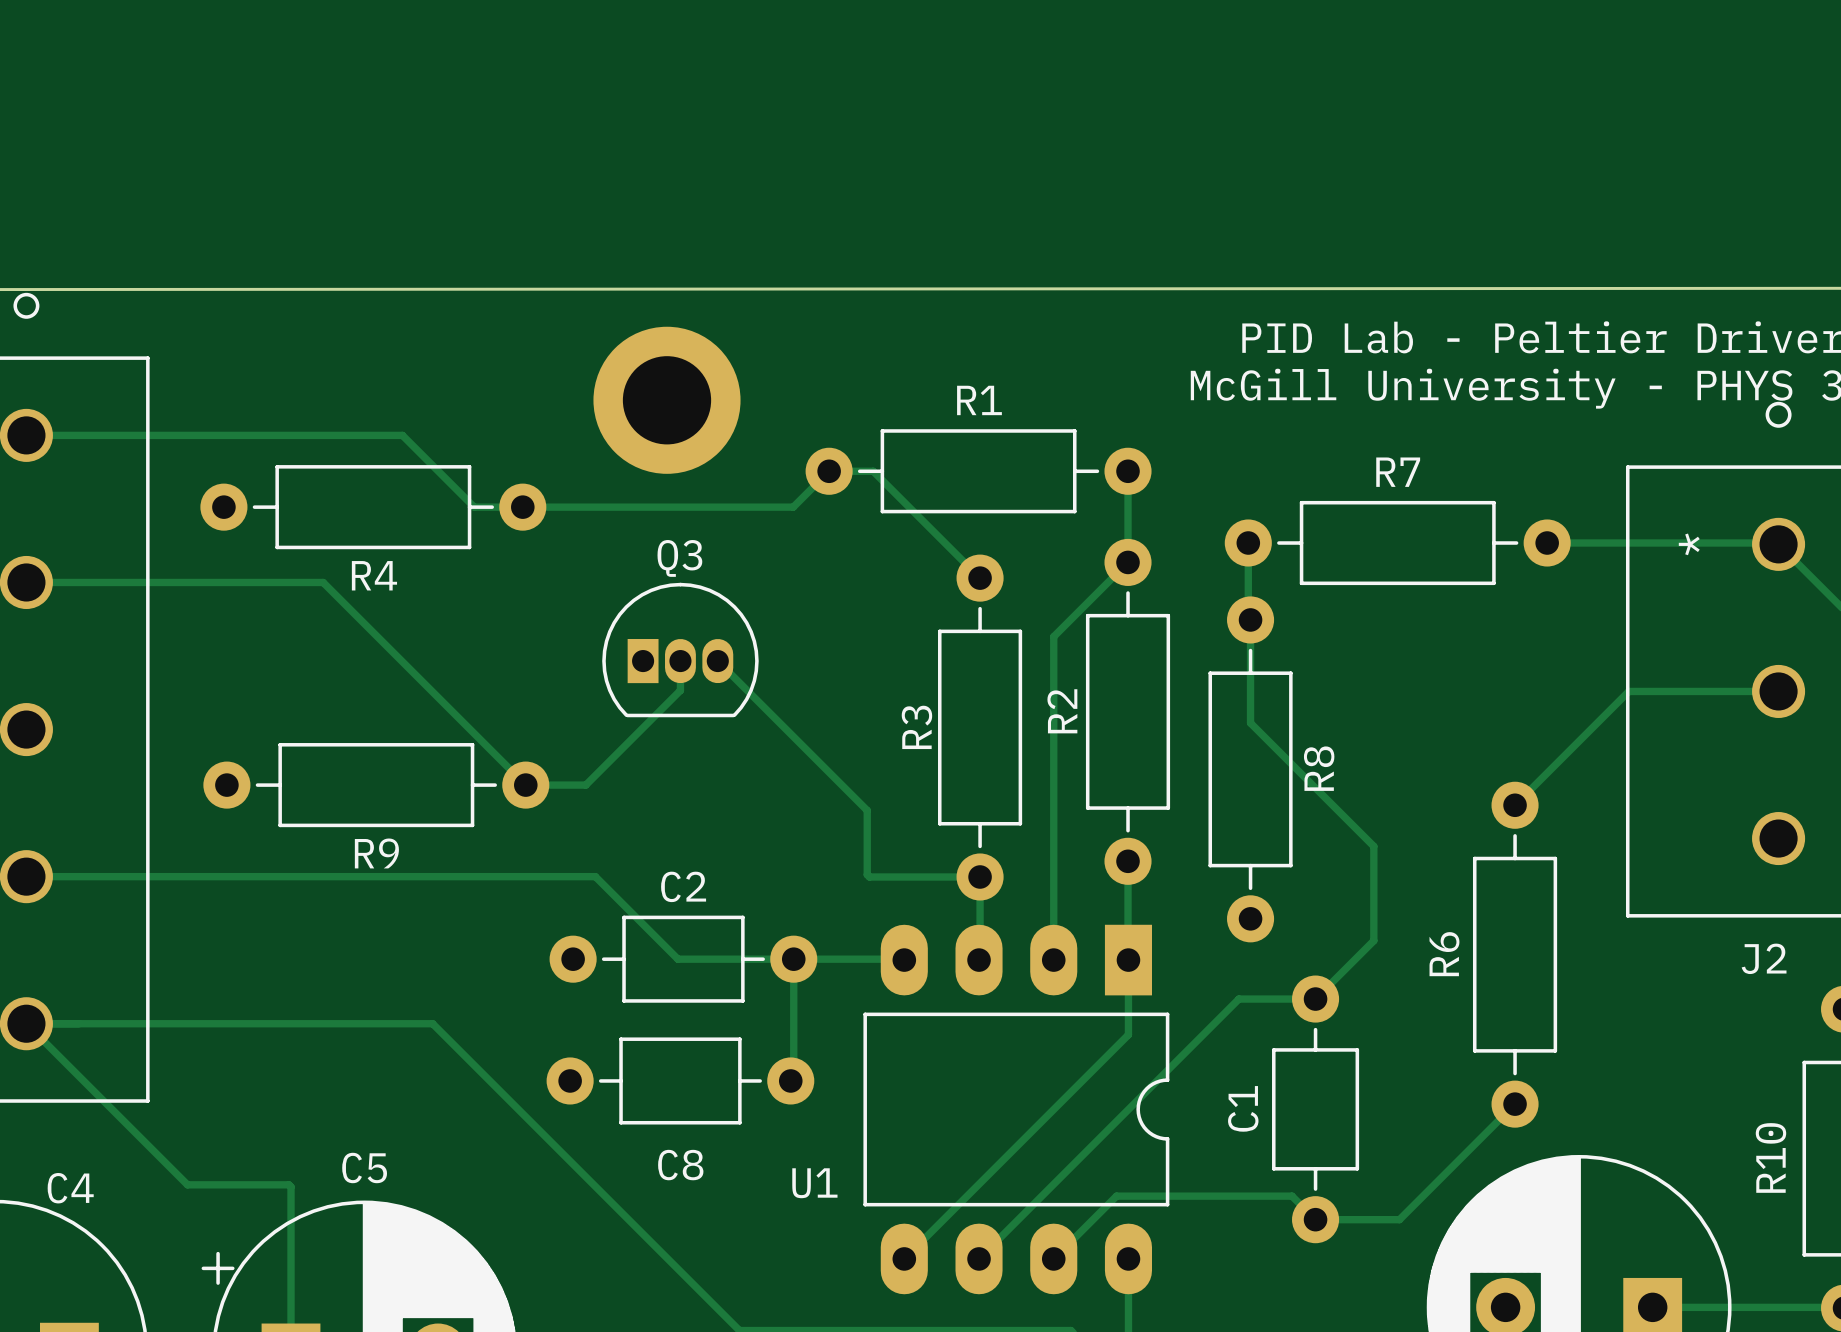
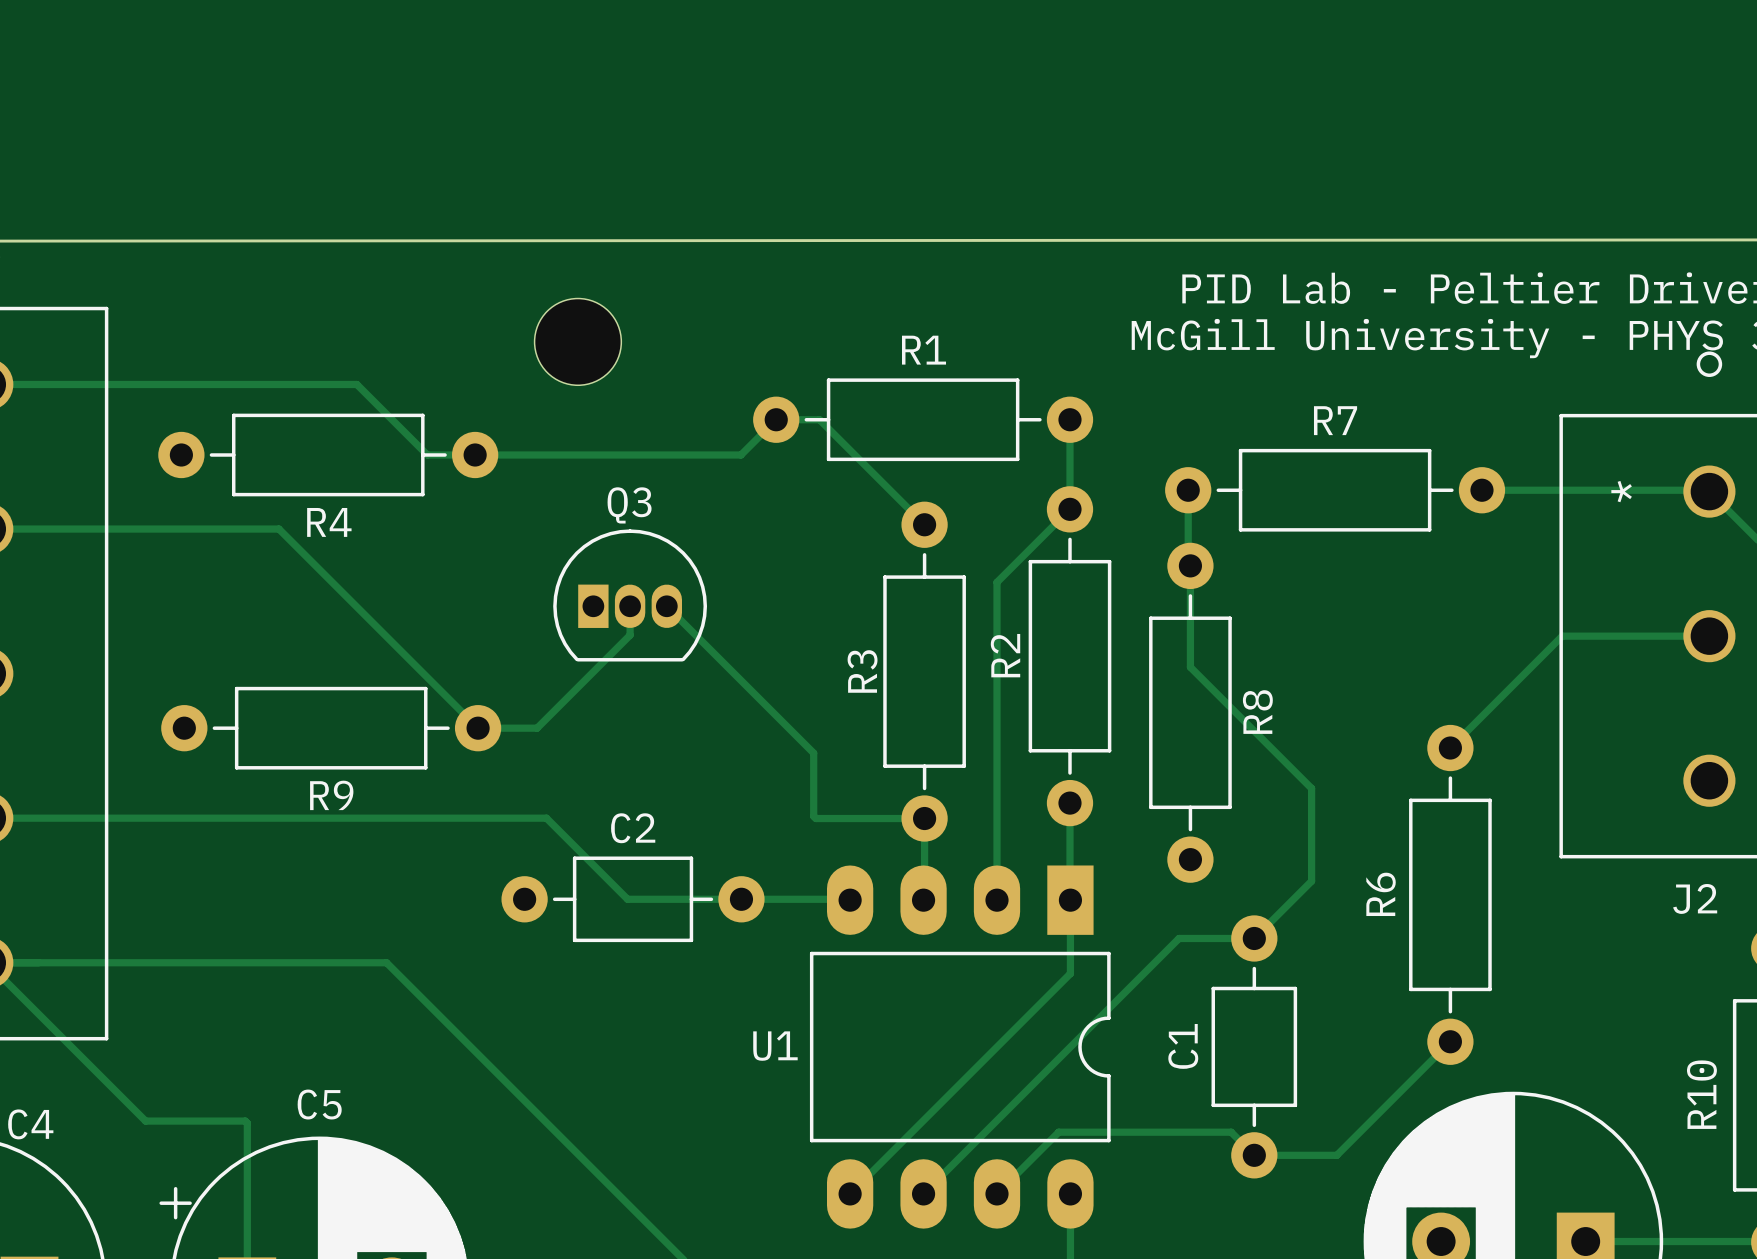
part: none -> (577, 341)
part: (667, 400) -> none
track: (793, 959) (793, 1077) (790, 1080) -> none
C8: (680, 1080) -> none
U1 name position: U1 (814, 1183) -> U1 (775, 1046)

